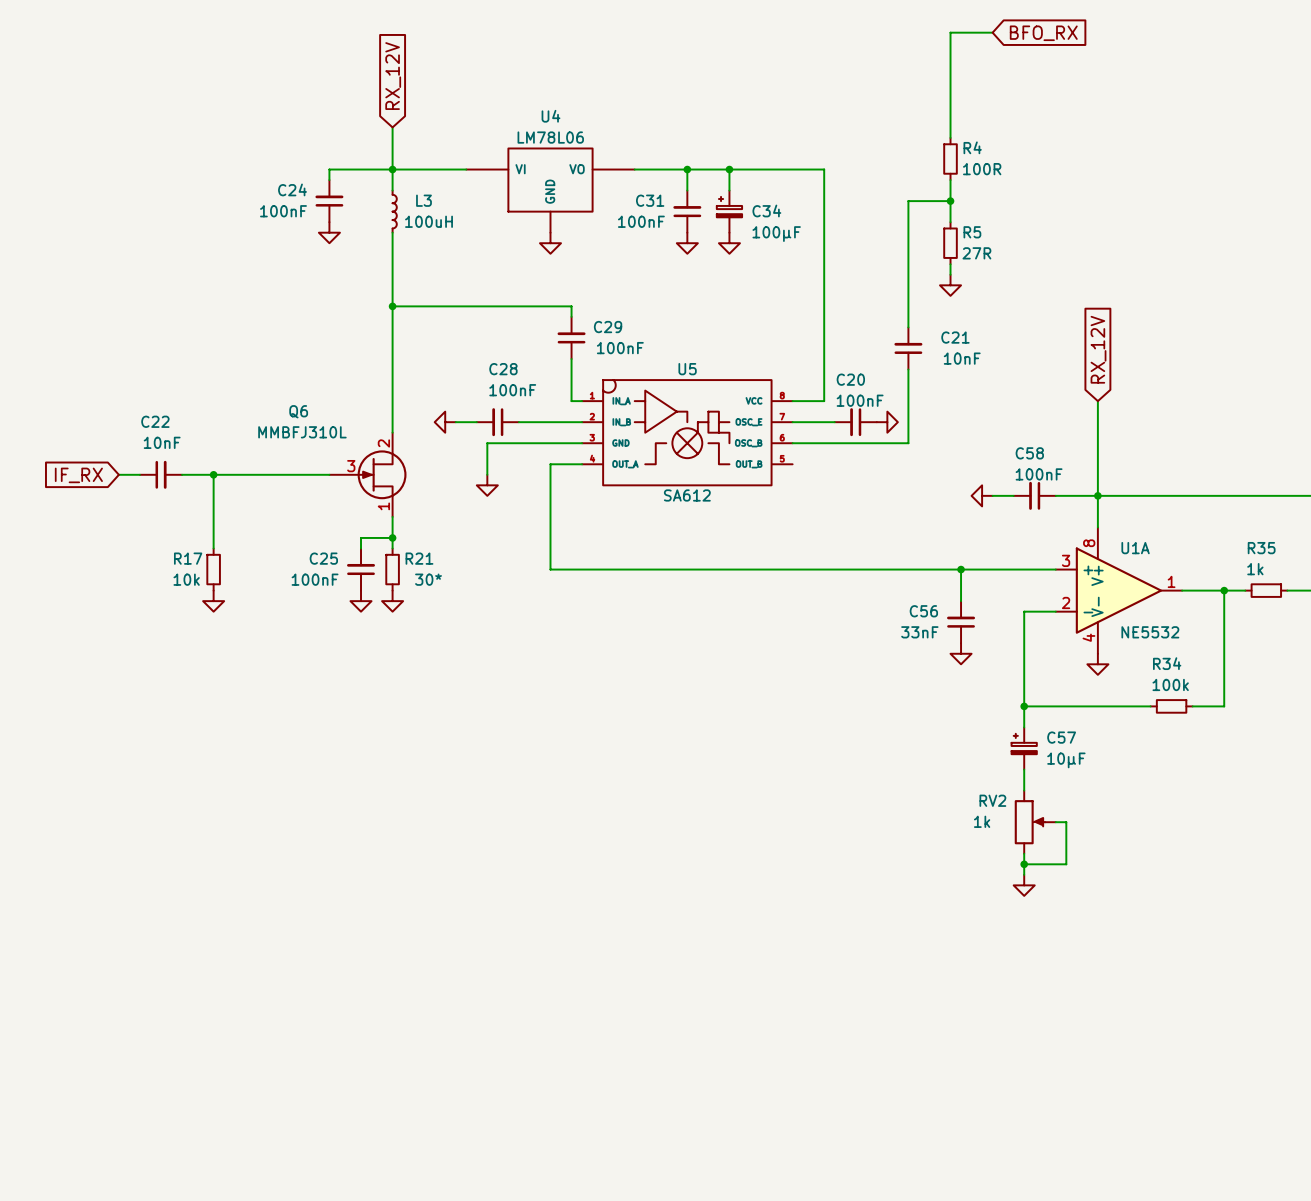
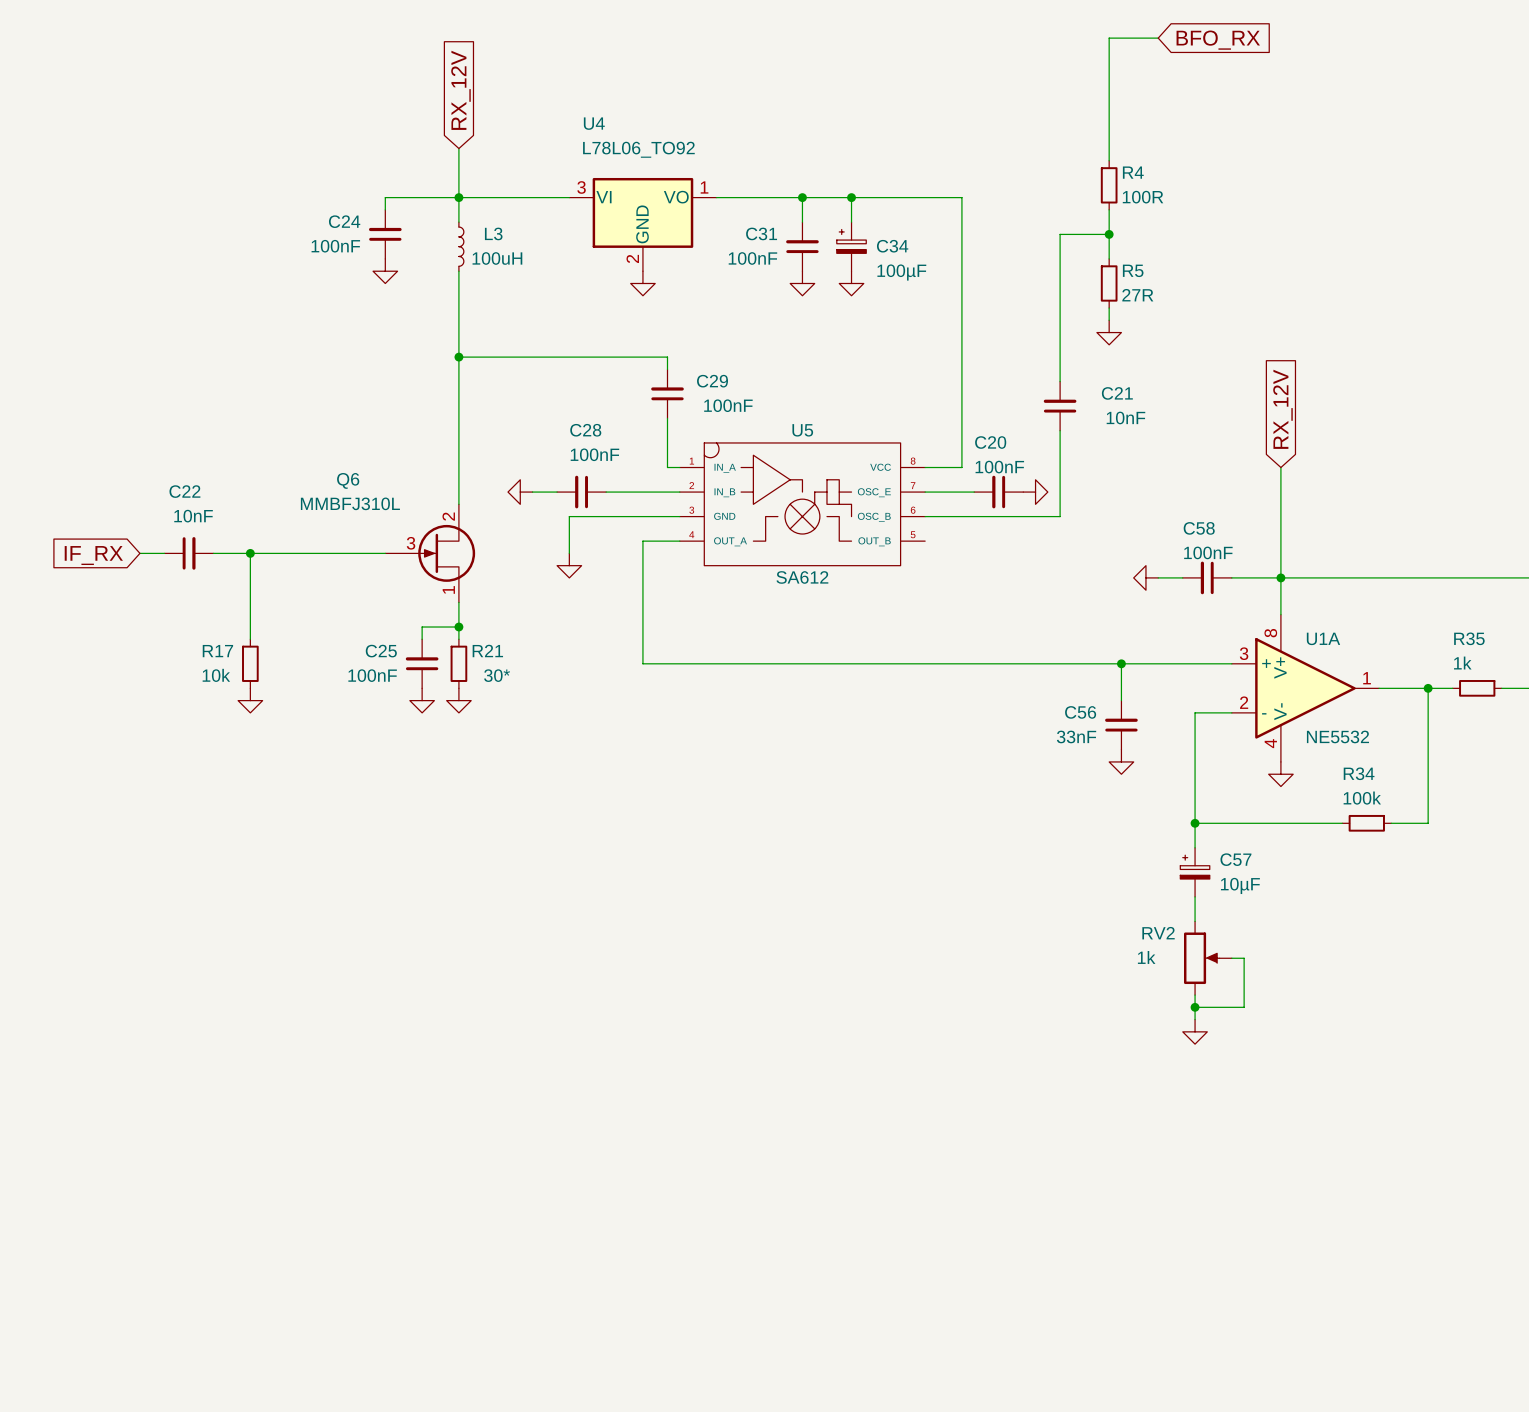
U4 name position: U4 (550, 116) -> U4 (594, 123)
U4 value: LM78L06 (550, 137) -> L78L06_TO92 (638, 149)
U4 symbol: [466, 148, 635, 233] -> [569, 177, 717, 272]

